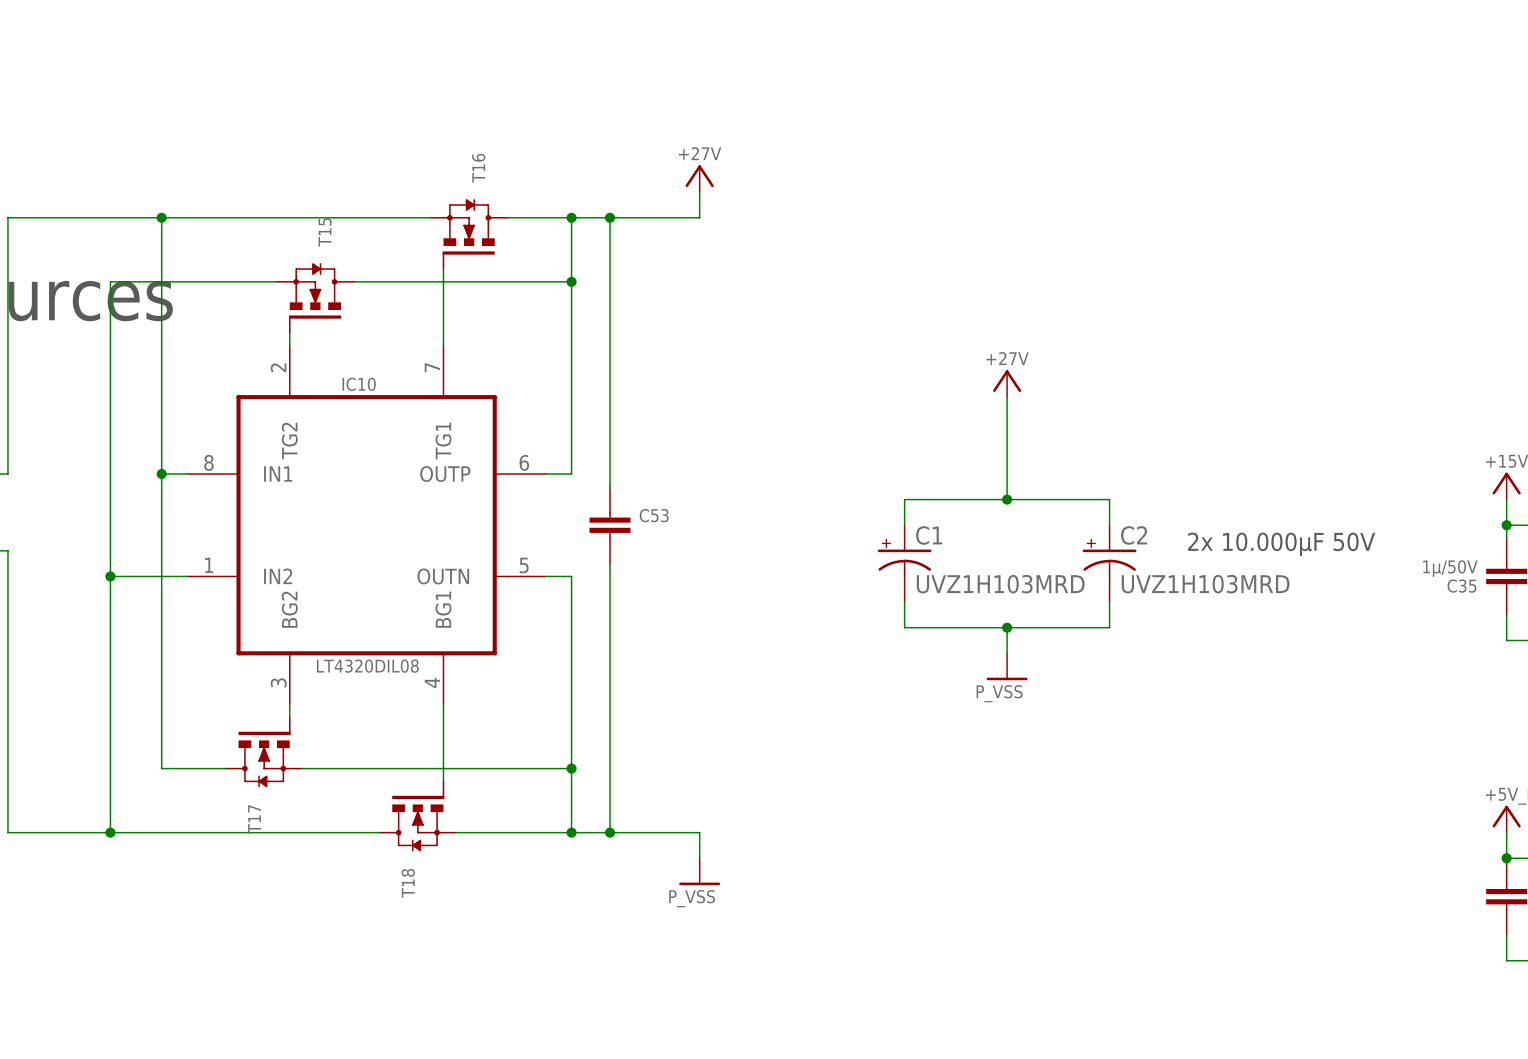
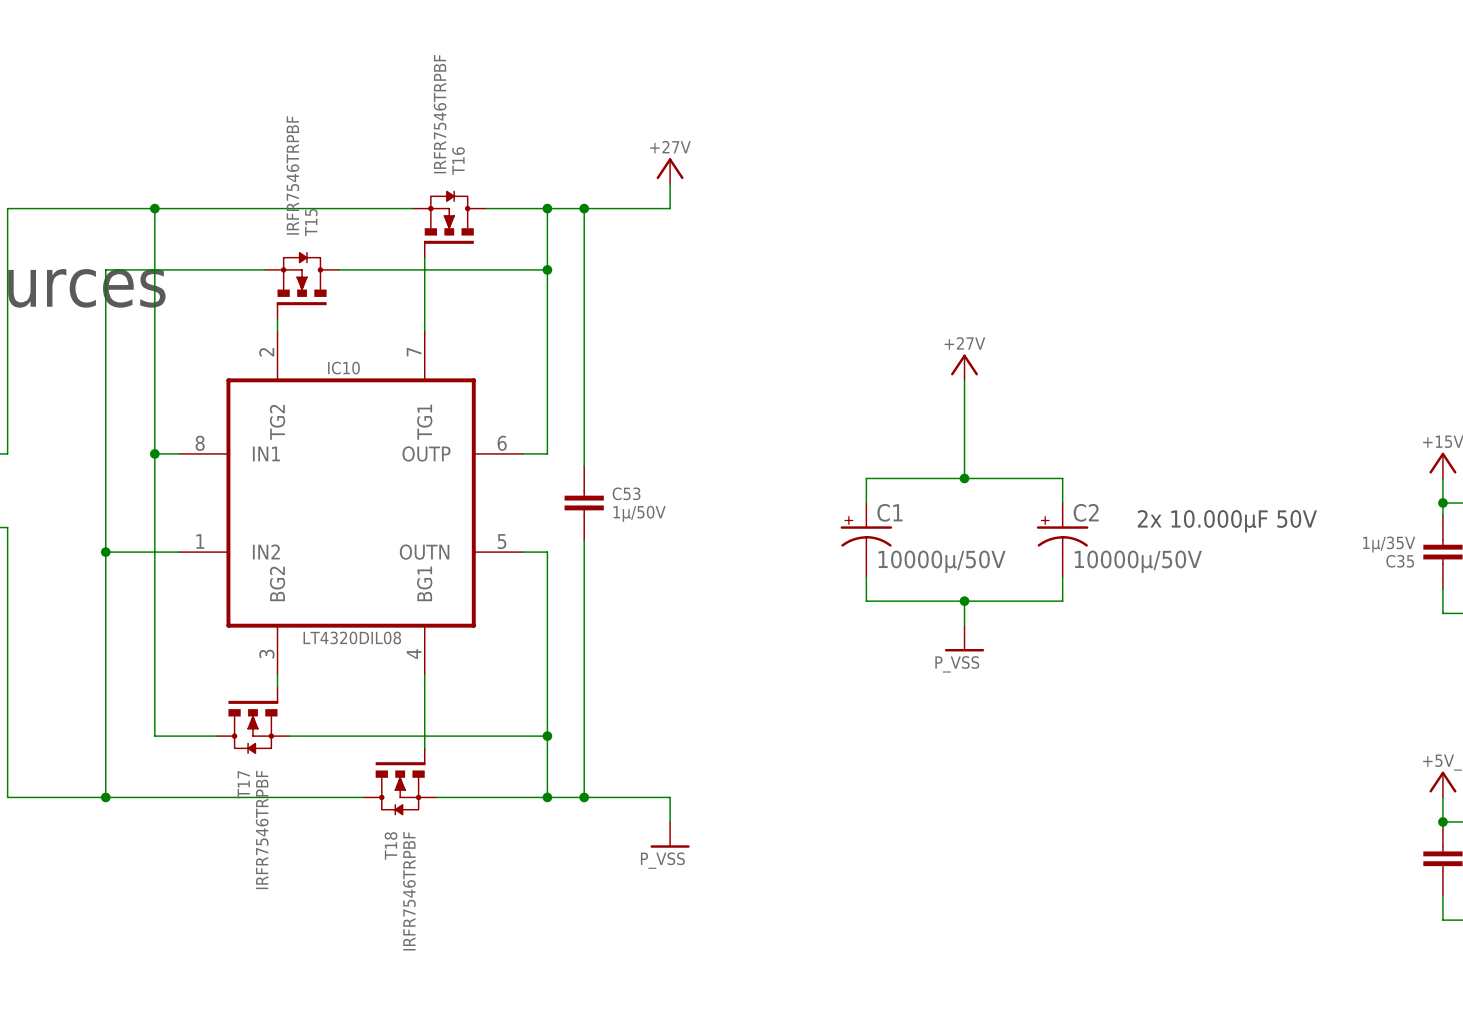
T16 value: none -> IRFR7546TRPBF (440, 114)
T15 value: none -> IRFR7546TRPBF (292, 175)
C53 value: none -> 1µ/50V (639, 513)
C35 value: 1µ/50V (1450, 568) -> 1µ/35V (1389, 544)
C1 value: UVZ1H103MRD (1000, 584) -> 10000µ/50V (942, 561)
C2 value: UVZ1H103MRD (1205, 584) -> 10000µ/50V (1138, 561)
T17 value: none -> IRFR7546TRPBF (262, 829)
T18 value: none -> IRFR7546TRPBF (409, 891)

